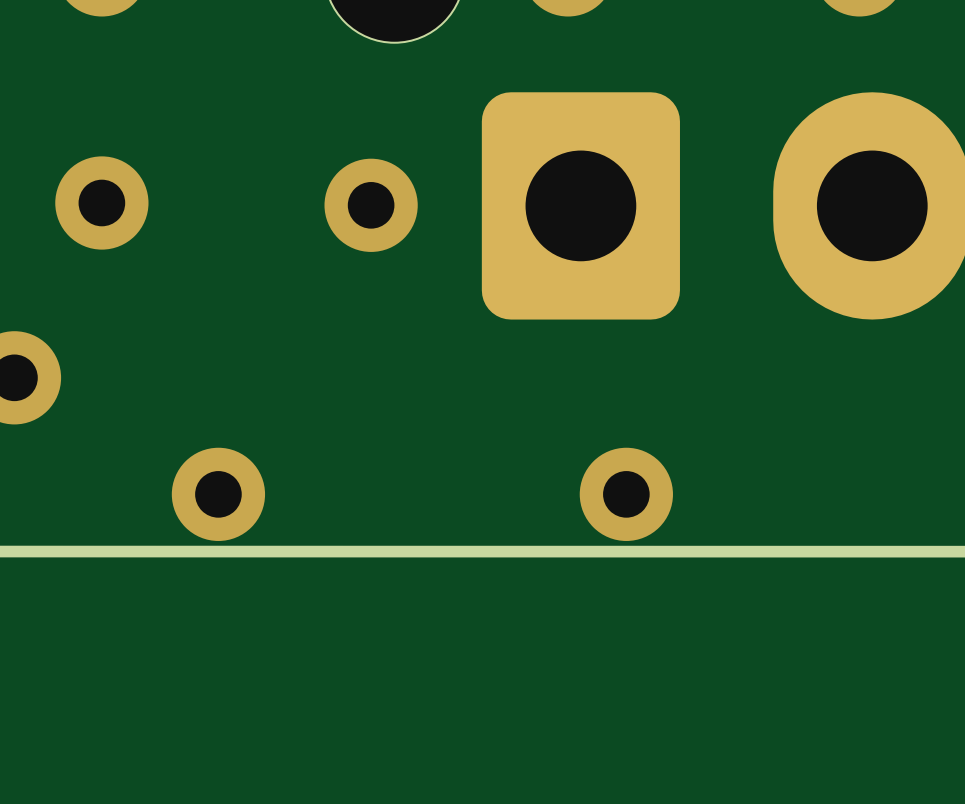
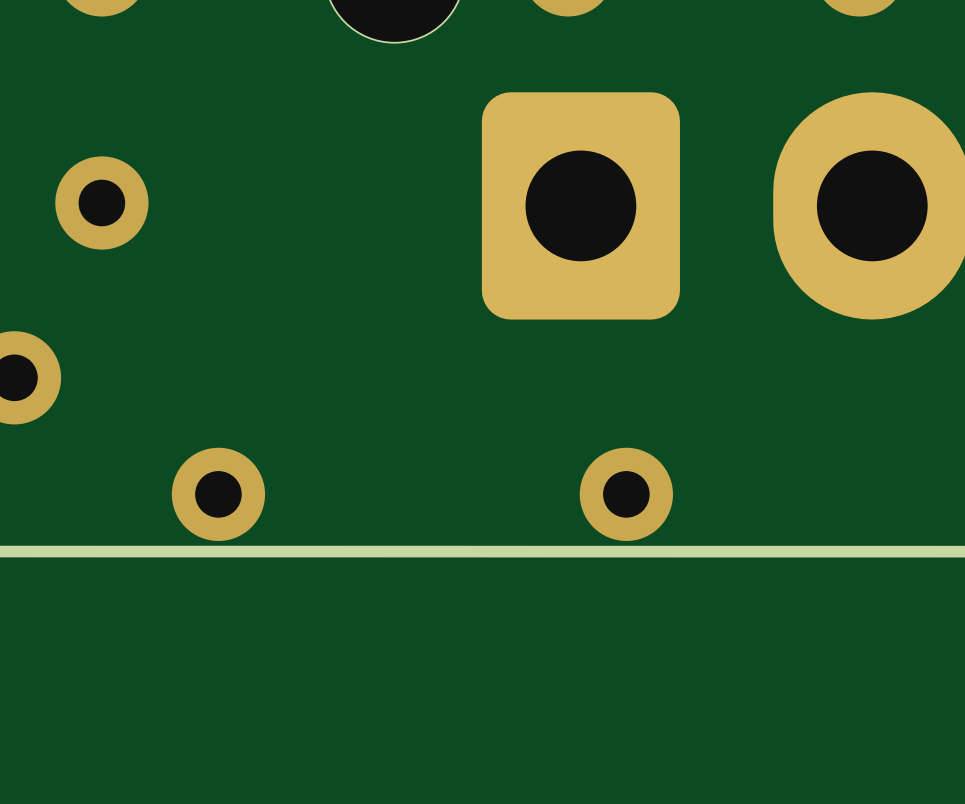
via: (371, 205) -> none

